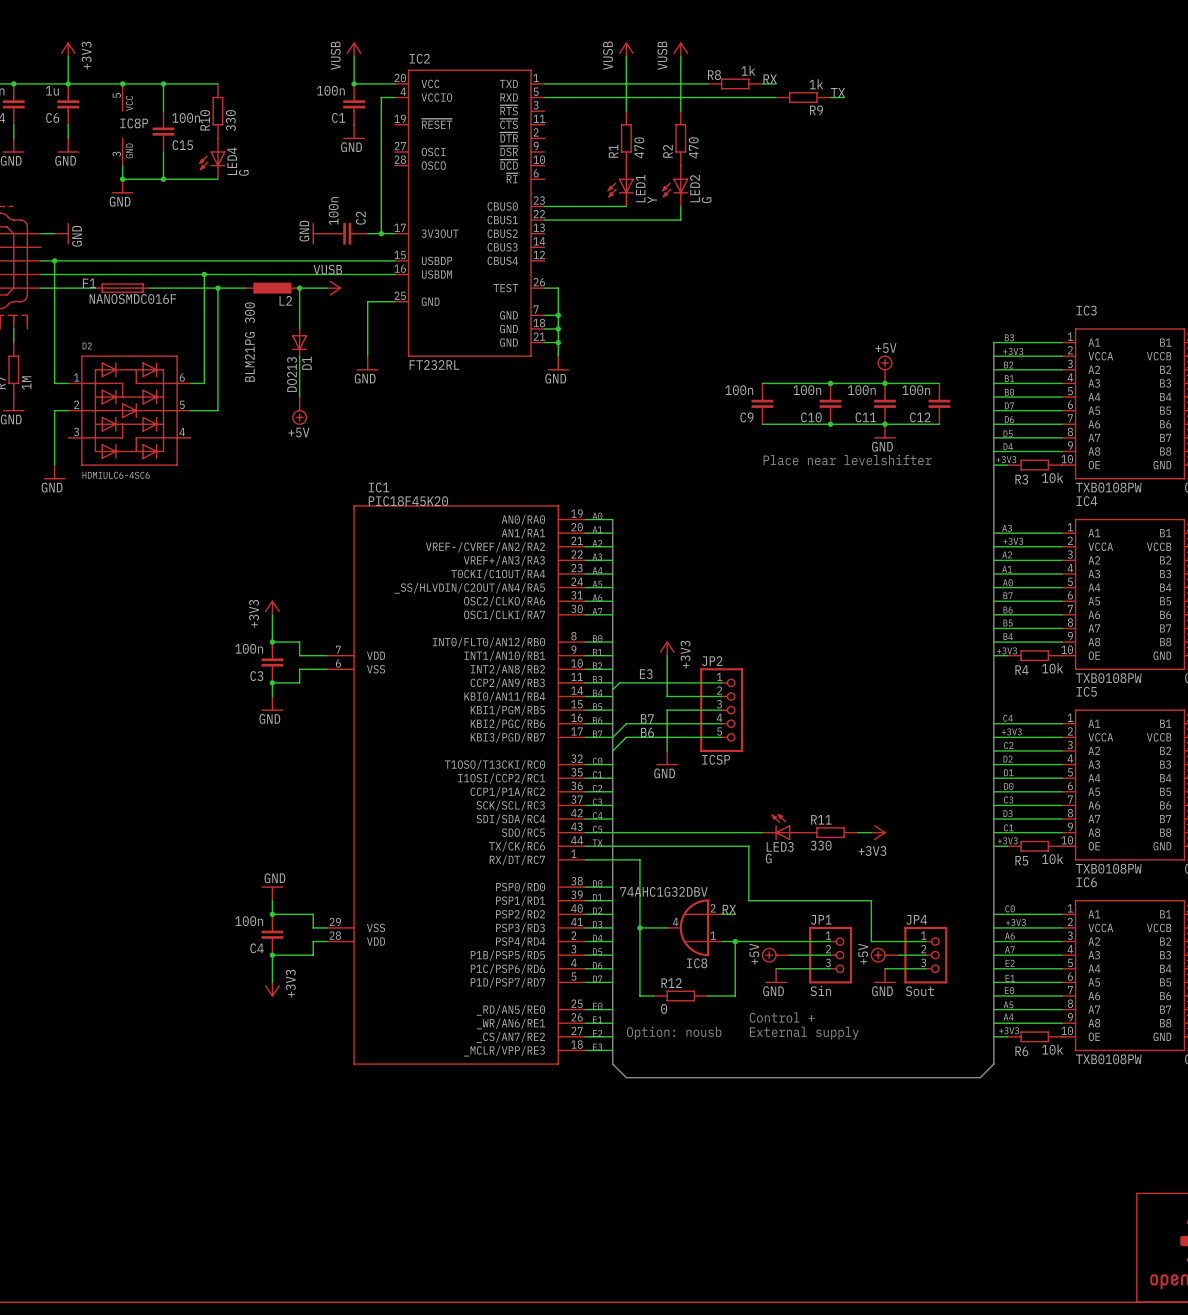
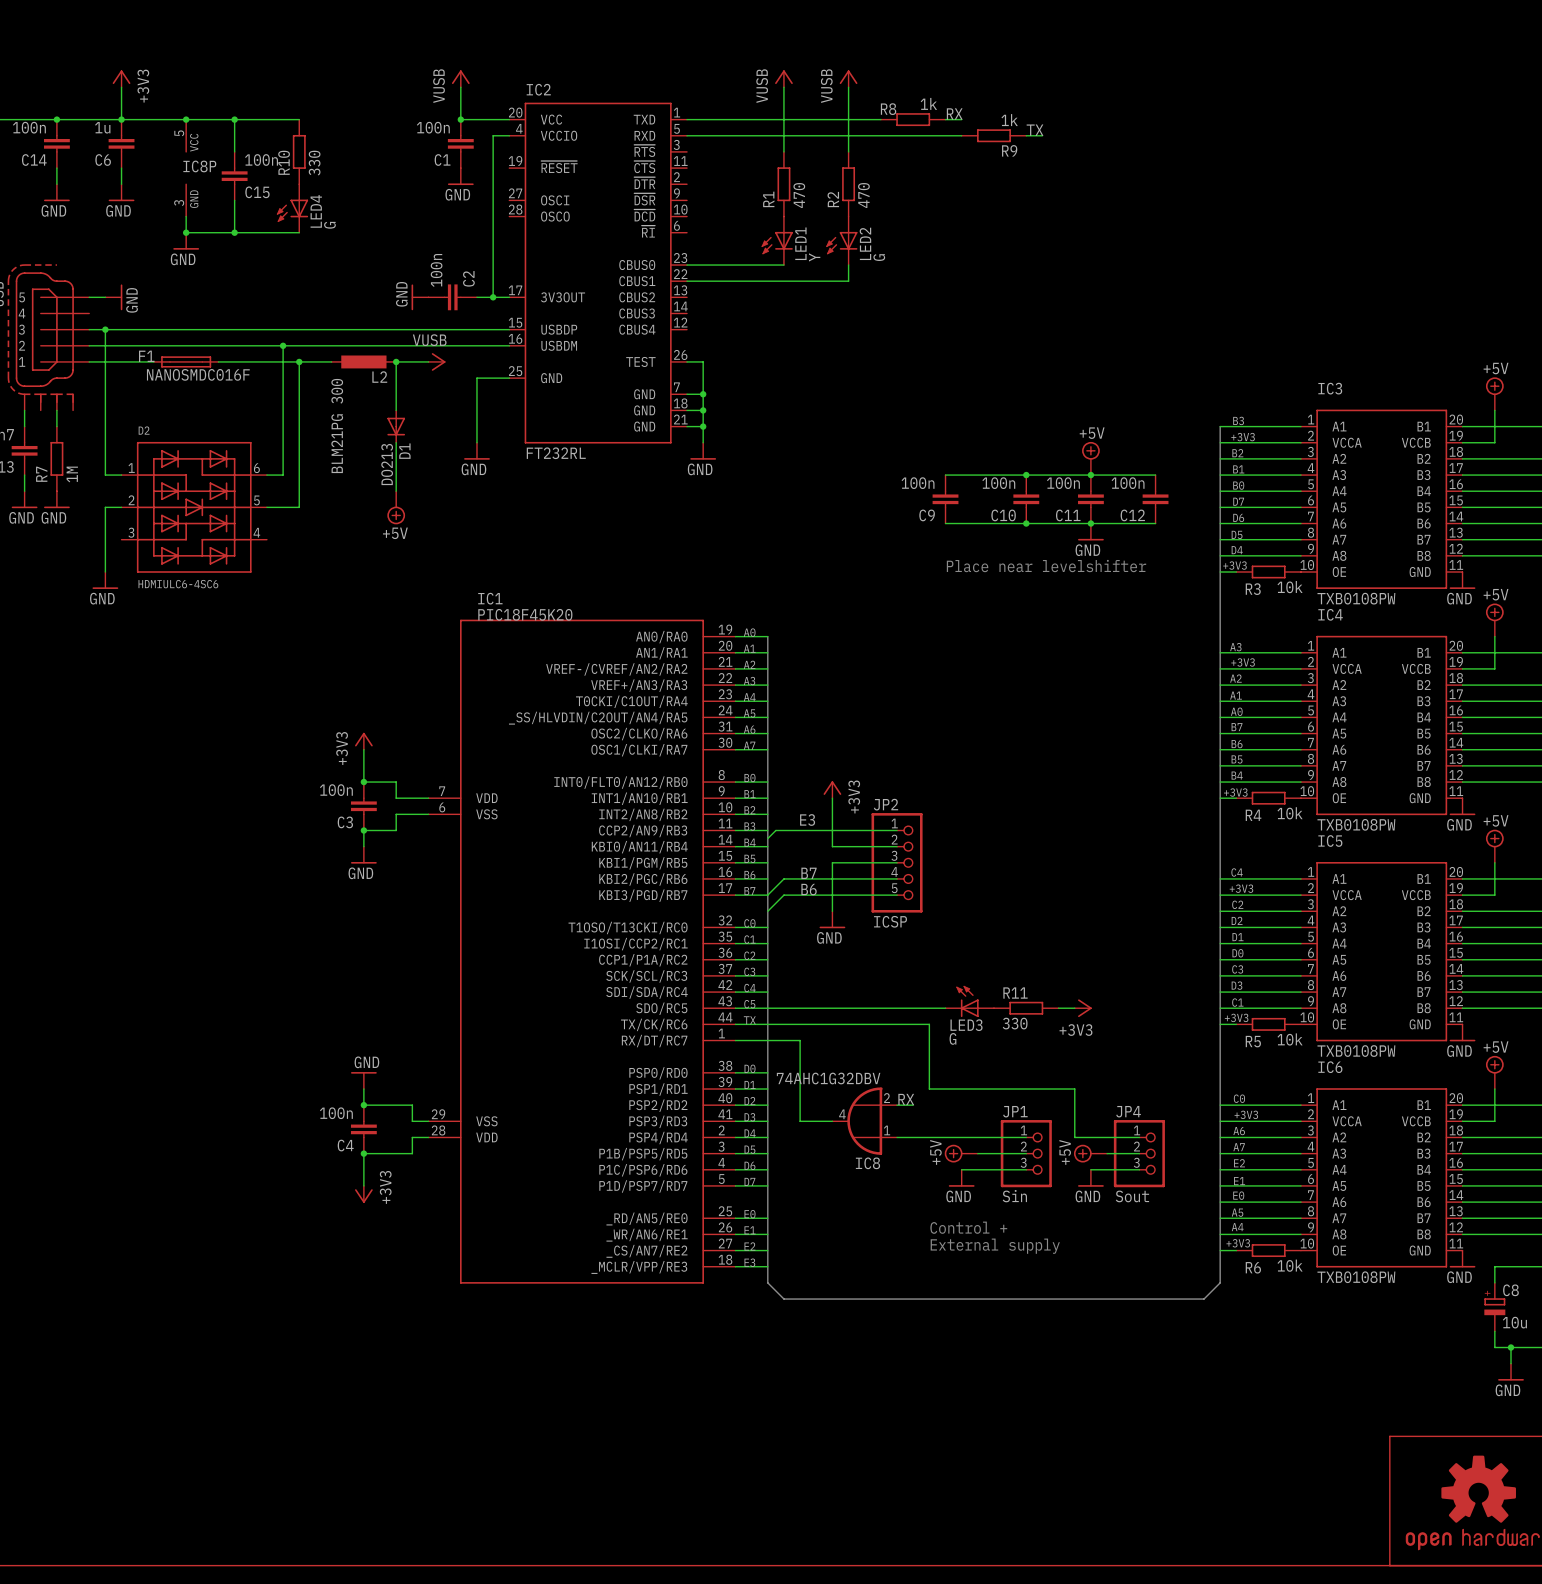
wire: (639, 927) (639, 996) (653, 996) -> none
junction: (639, 927) -> none
wire: (735, 941) (735, 996) (708, 996) -> none
junction: (735, 941) -> none
R12: 0 (680, 996) -> none
text: Option: nousb (674, 1033) -> none

